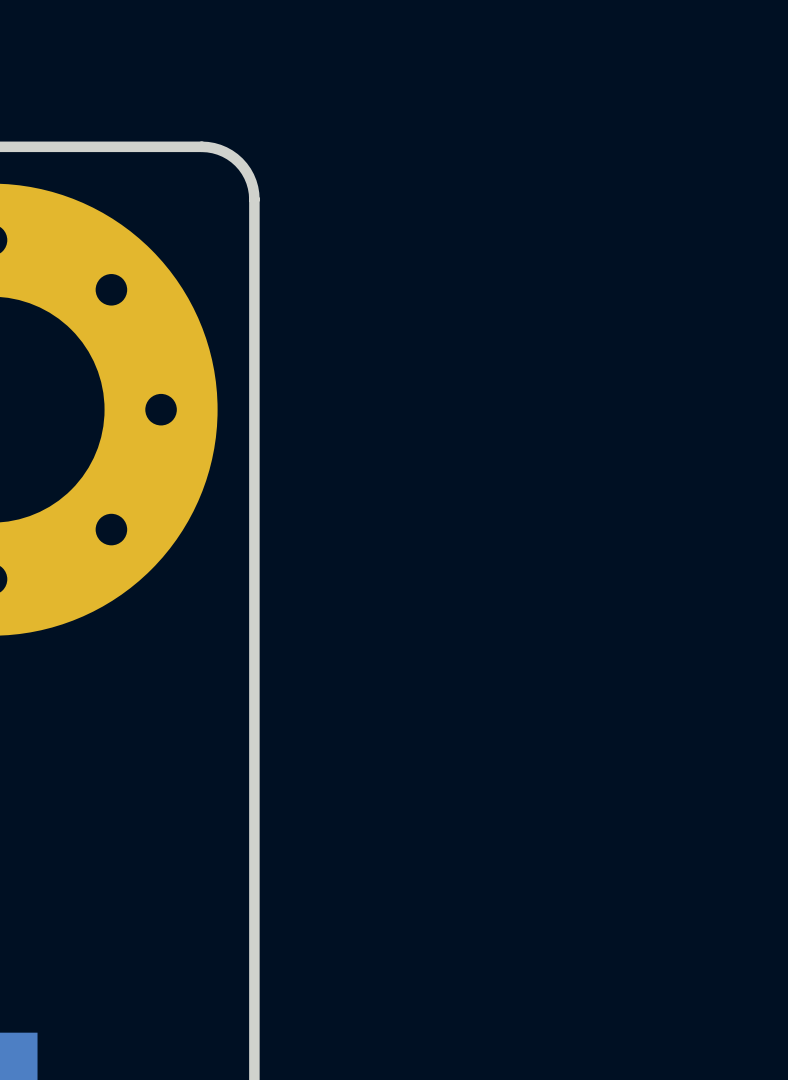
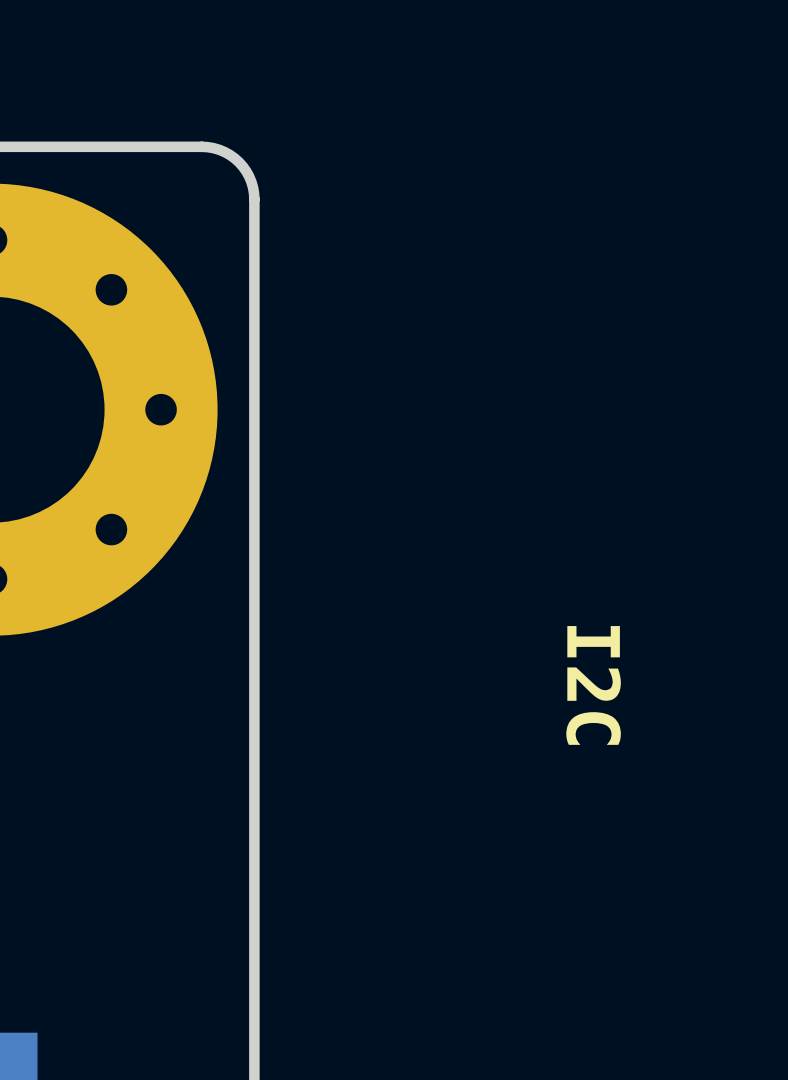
text: none -> I2C (593, 685)

